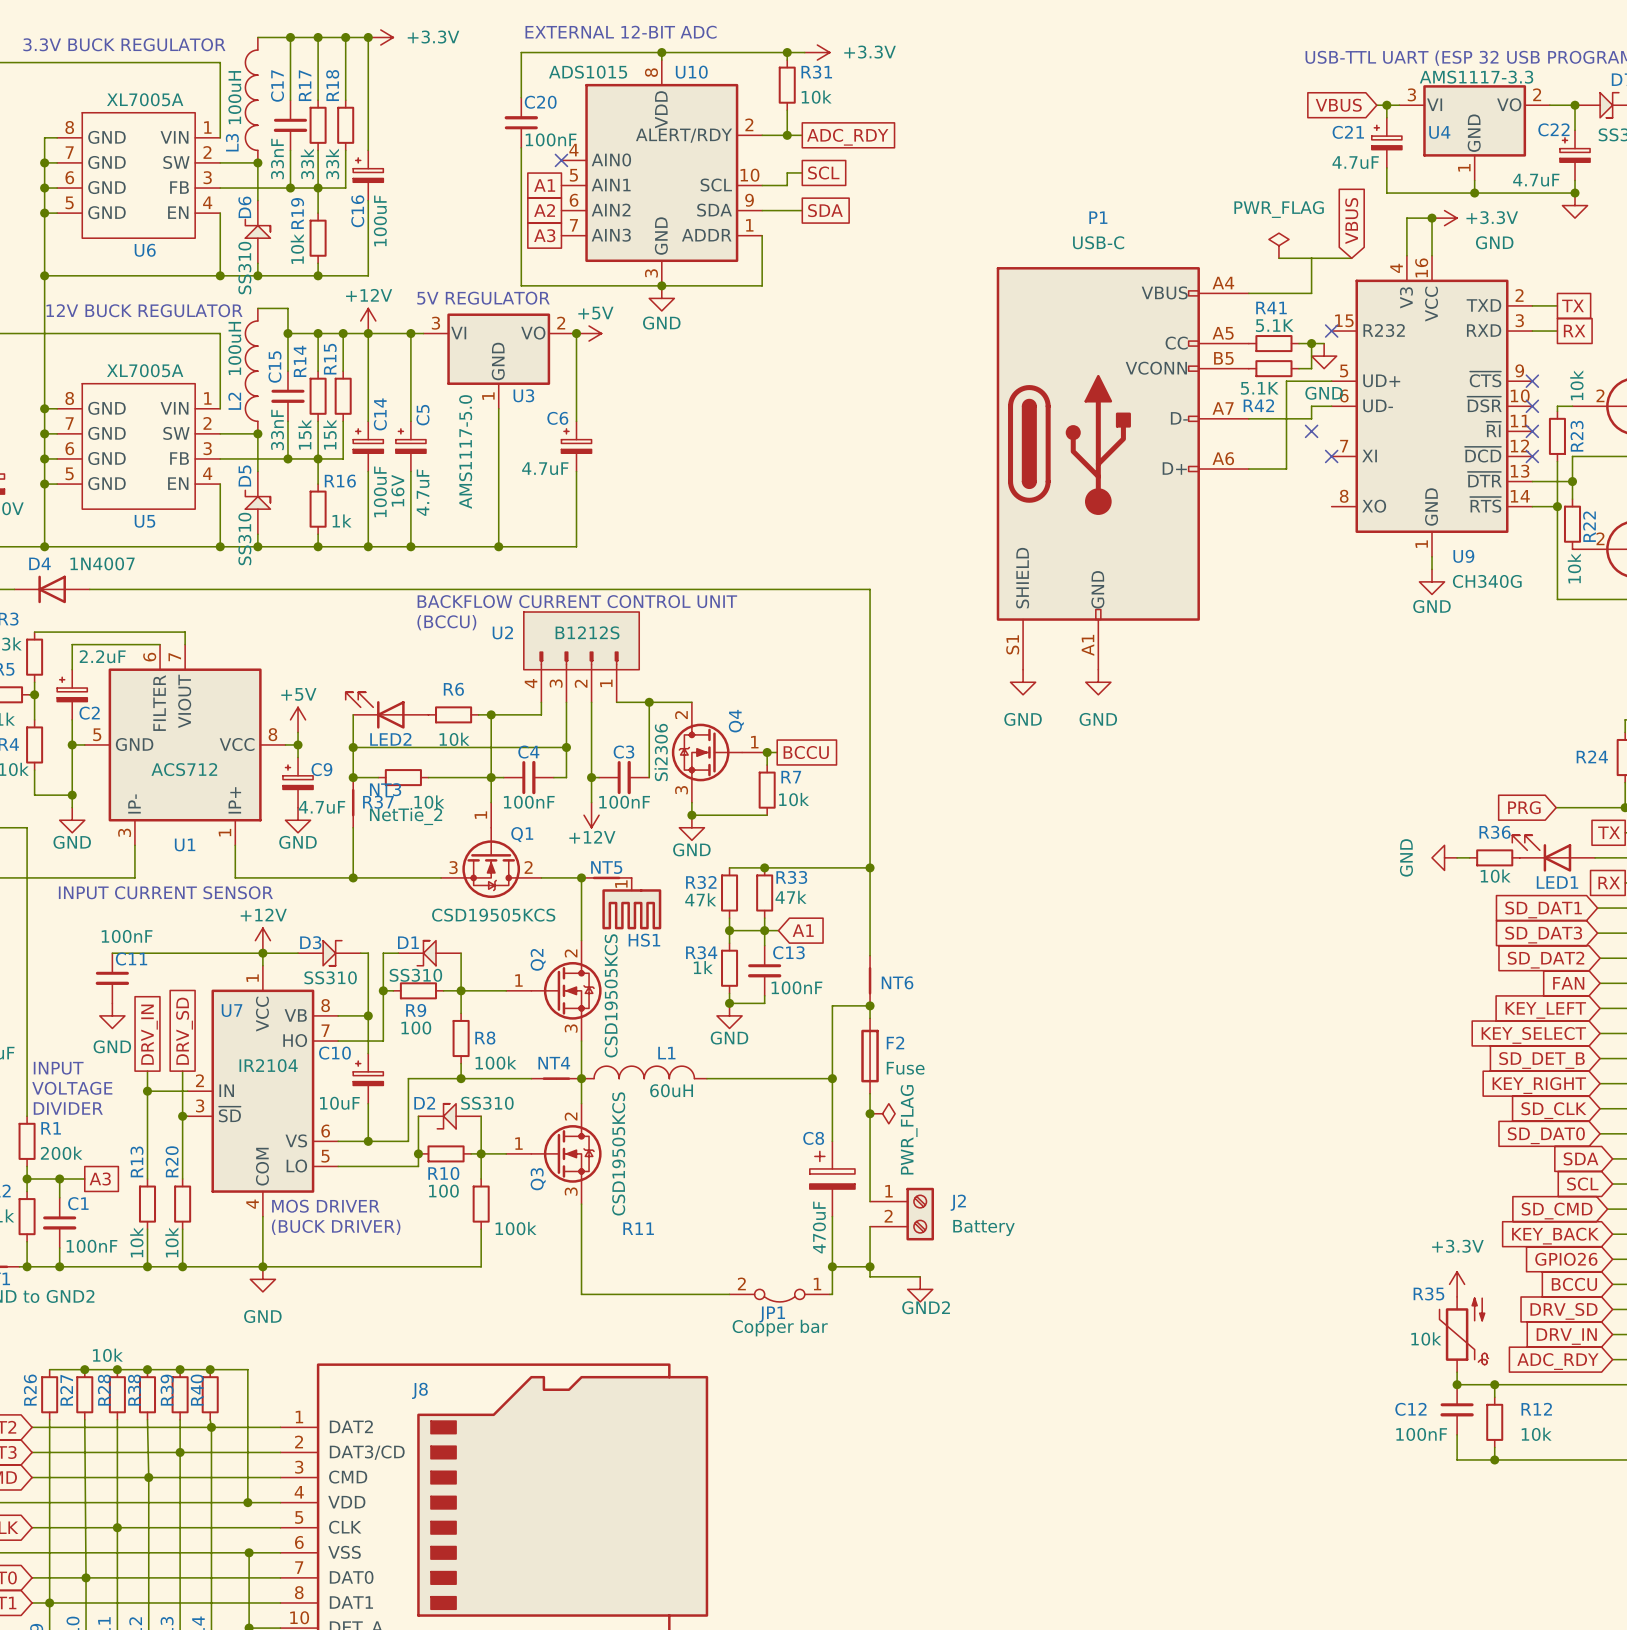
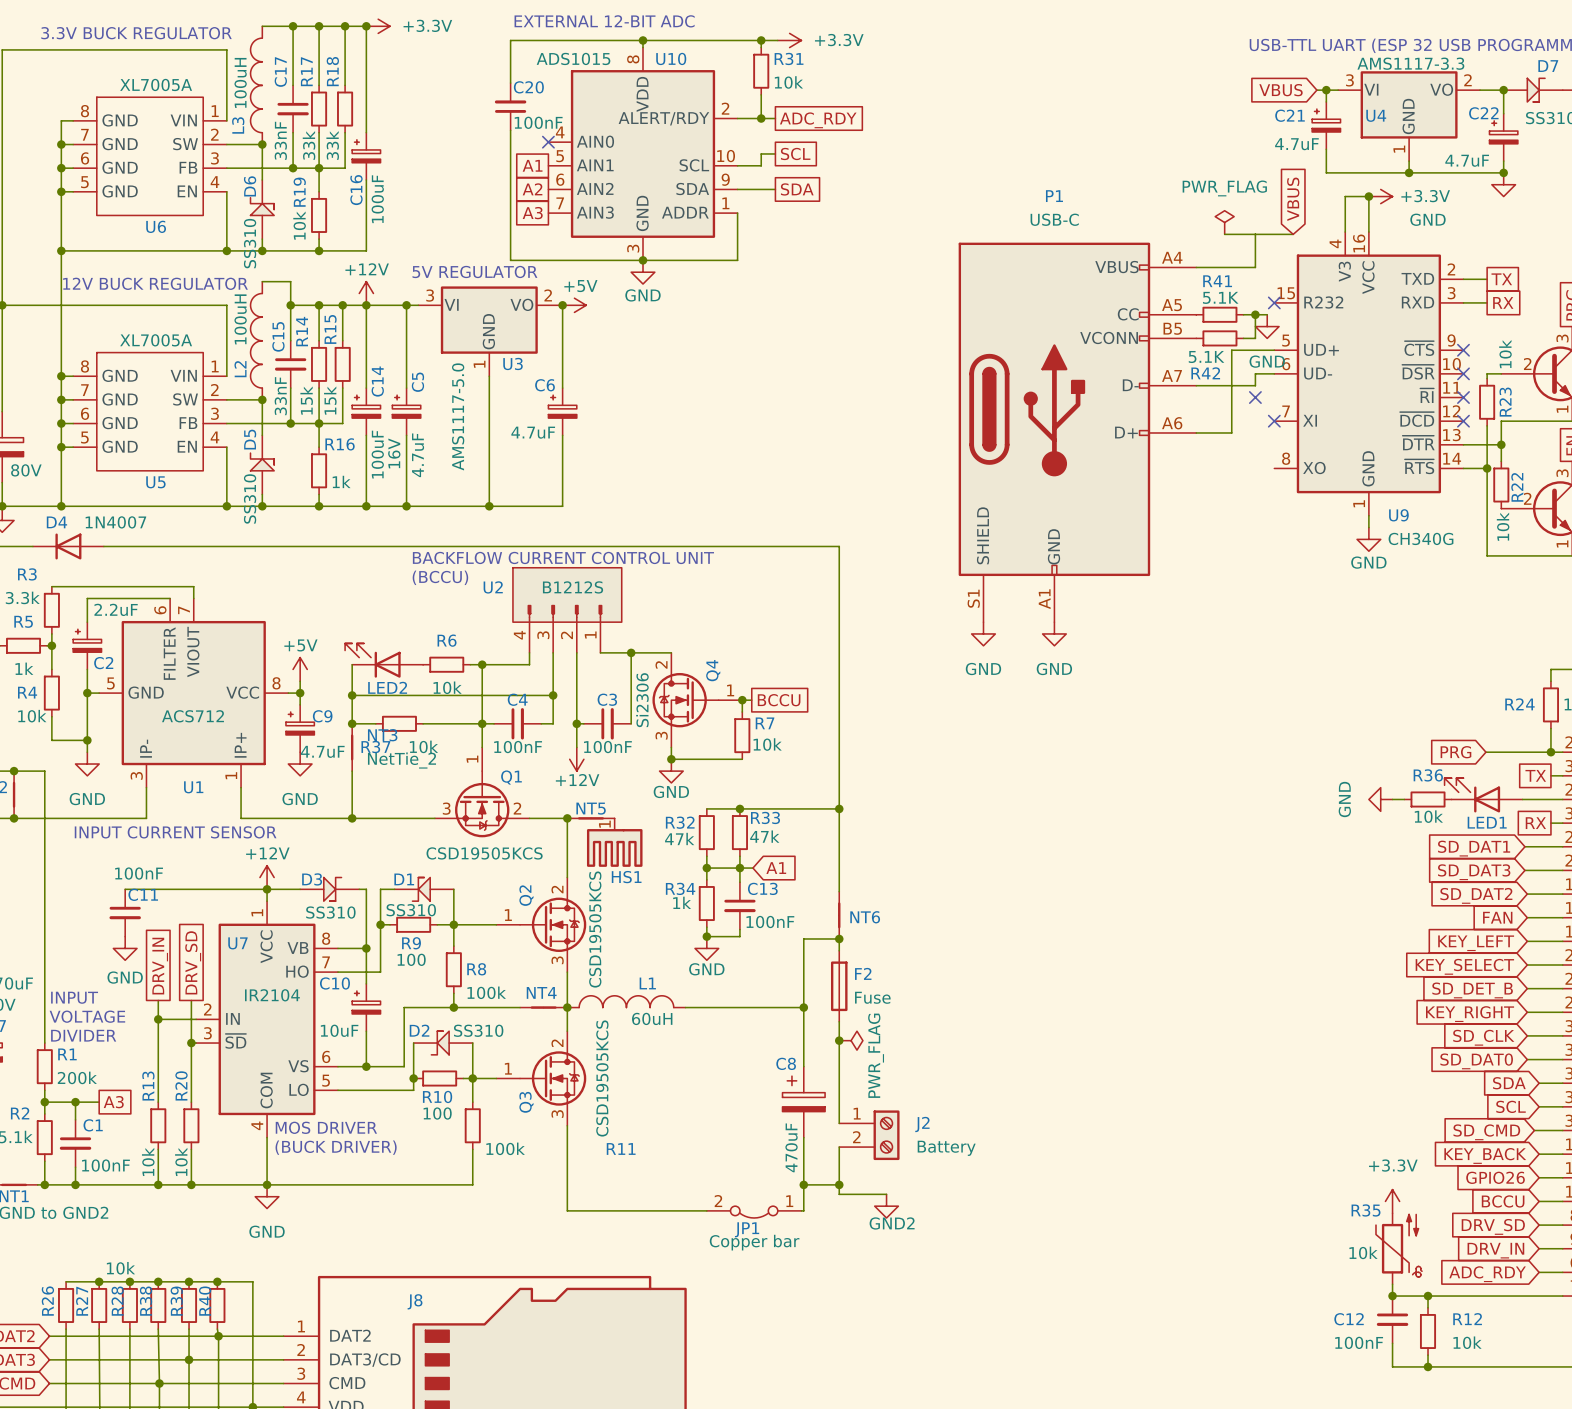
power symbol text position: GND (72, 842) -> GND (87, 799)
power symbol text position: GND (298, 842) -> GND (300, 799)

